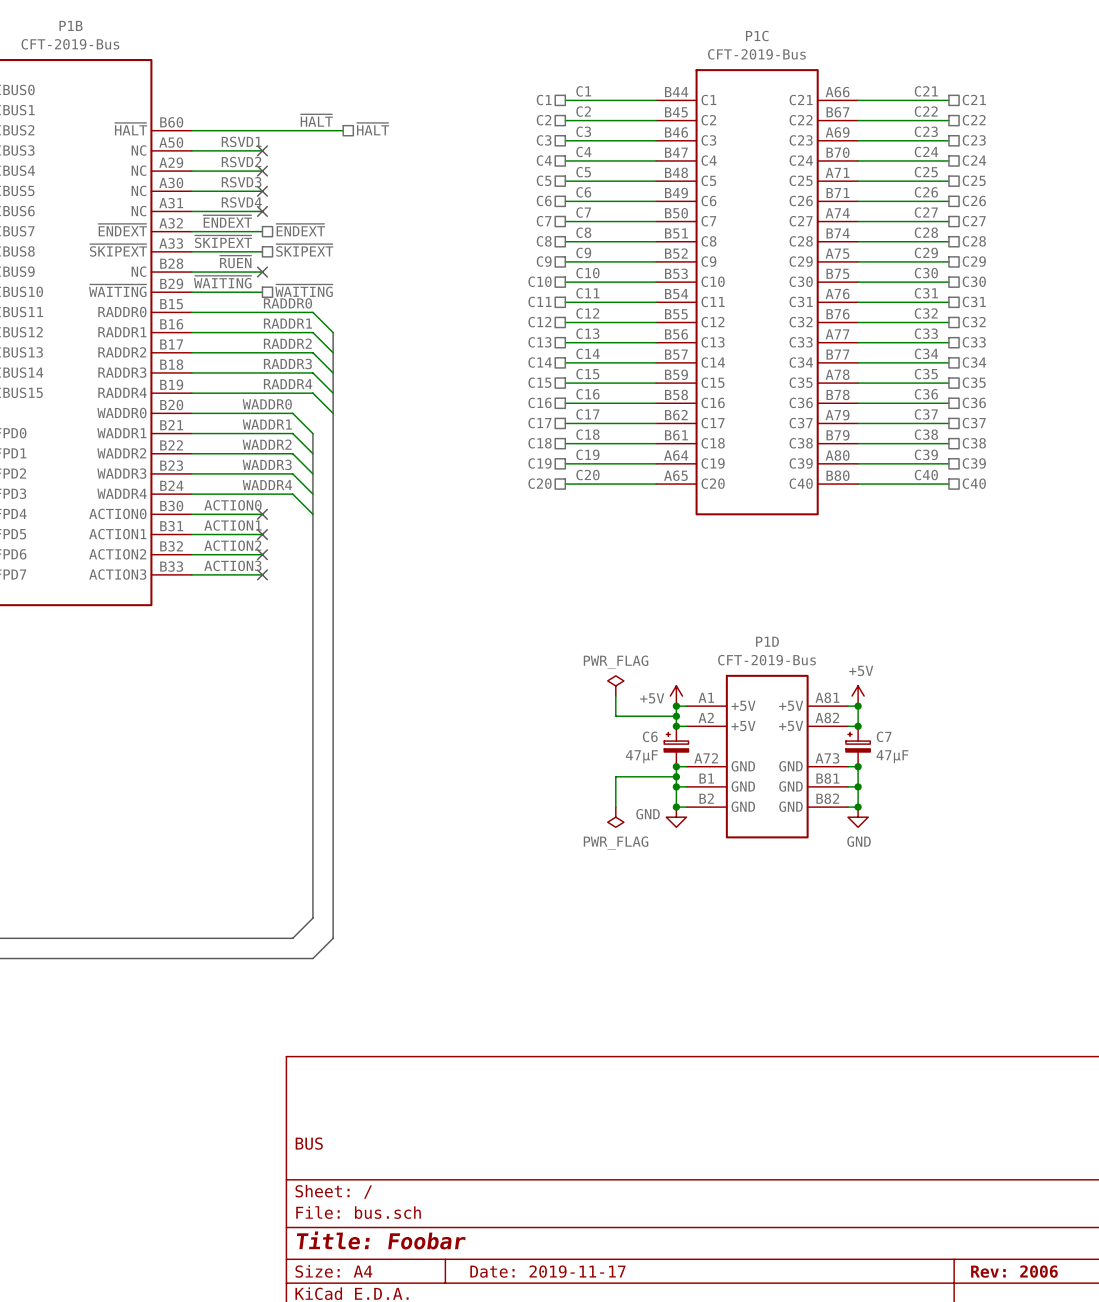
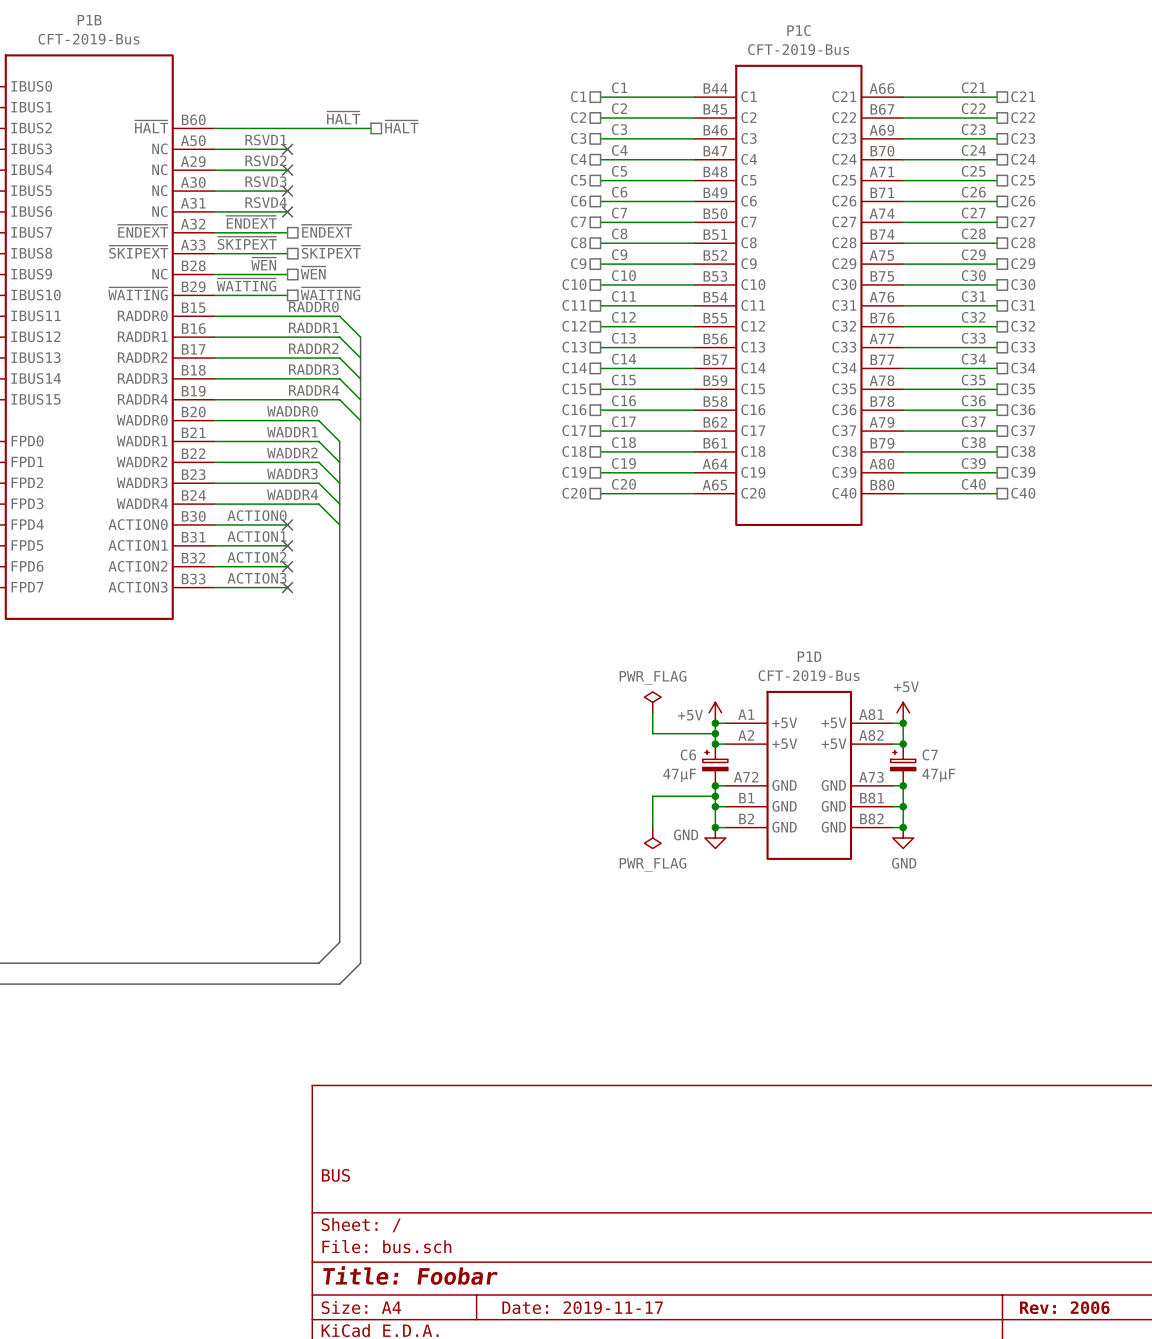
label: ~{RUEN} (235, 261) -> ~{WEN} (263, 264)
hierarchical label: none -> ~{WEN} (313, 272)
no-connect mark: (262, 272) -> none

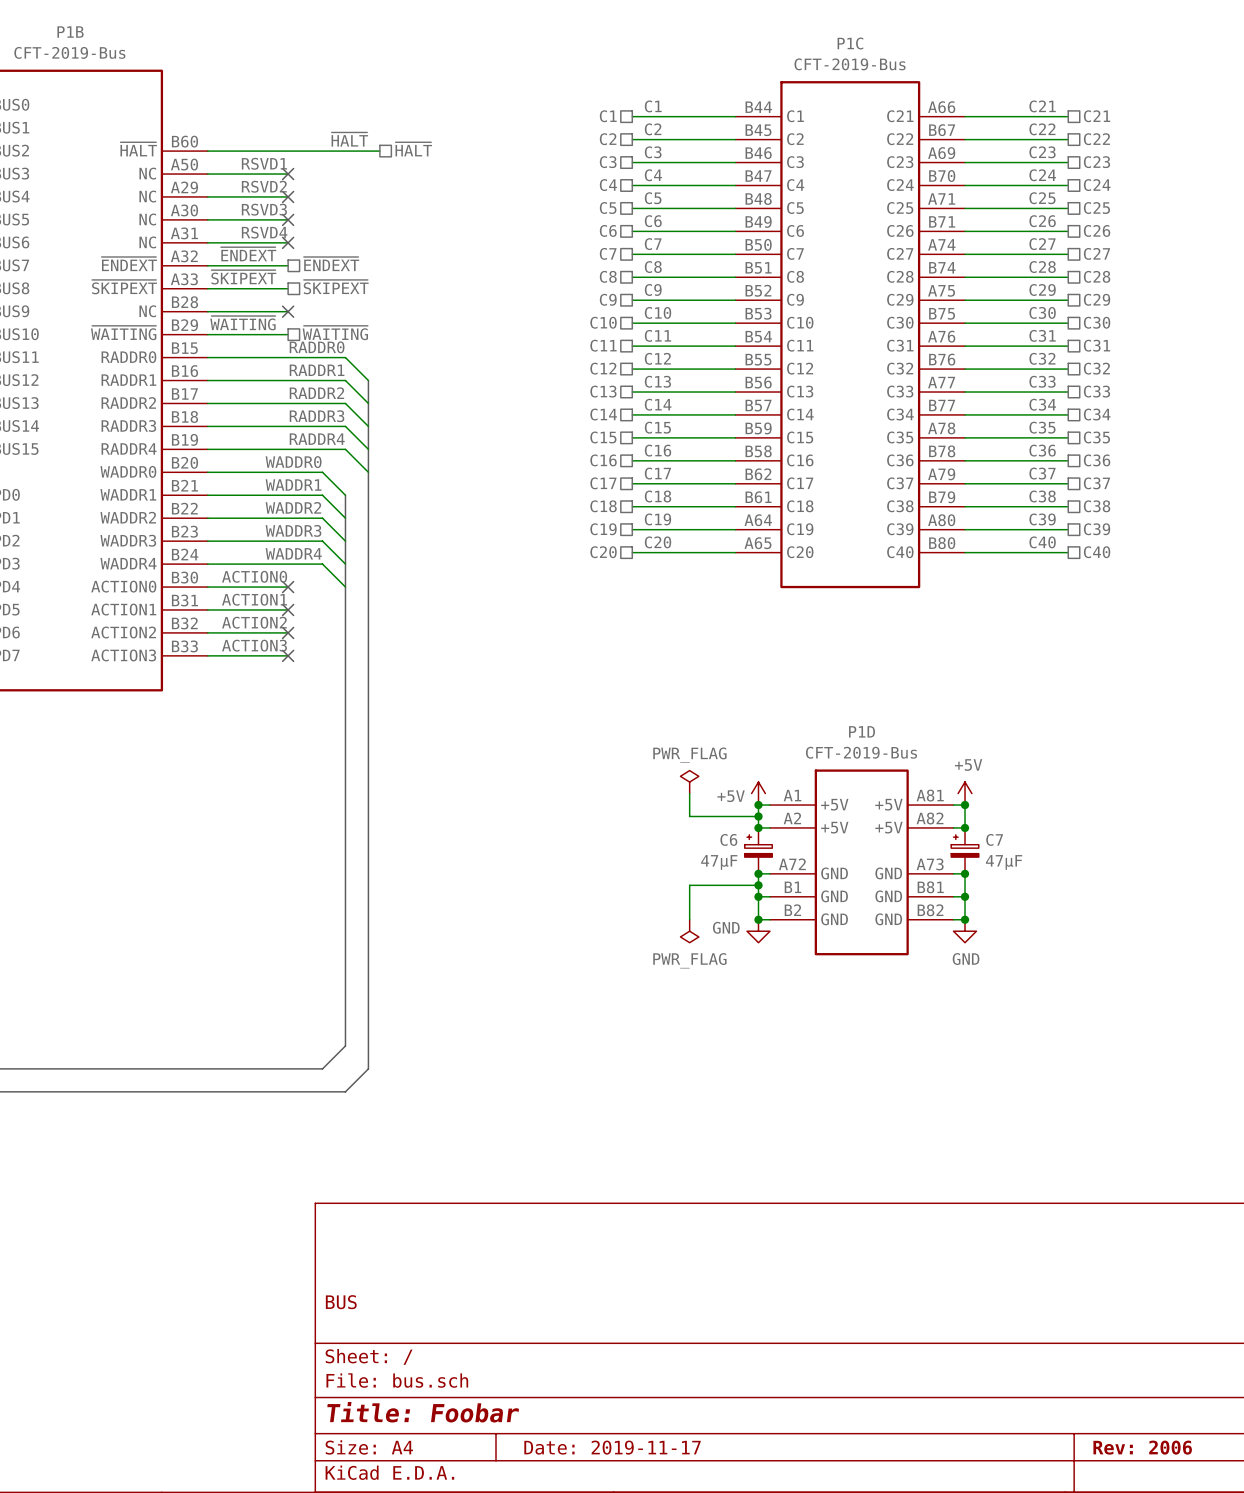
label: ~{WEN} (263, 264) -> none
hierarchical label: ~{WEN} (313, 272) -> none
no-connect mark: none -> (288, 311)

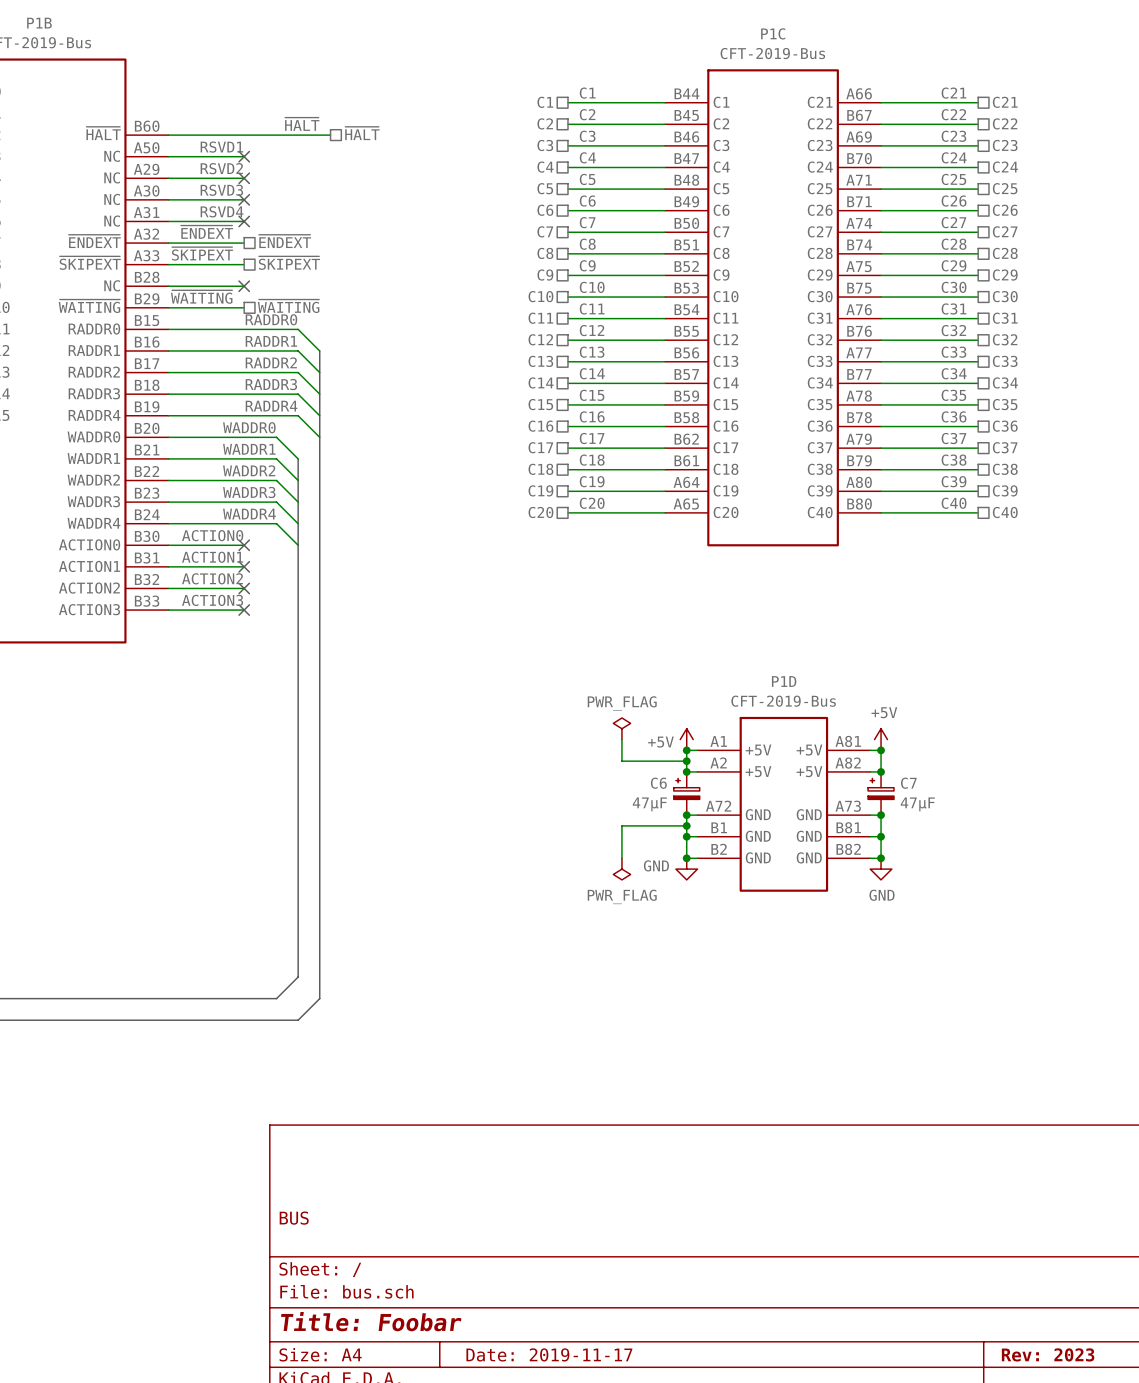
title block: Rev: 2006 (1142, 1447) -> Rev: 2023 (1048, 1354)

